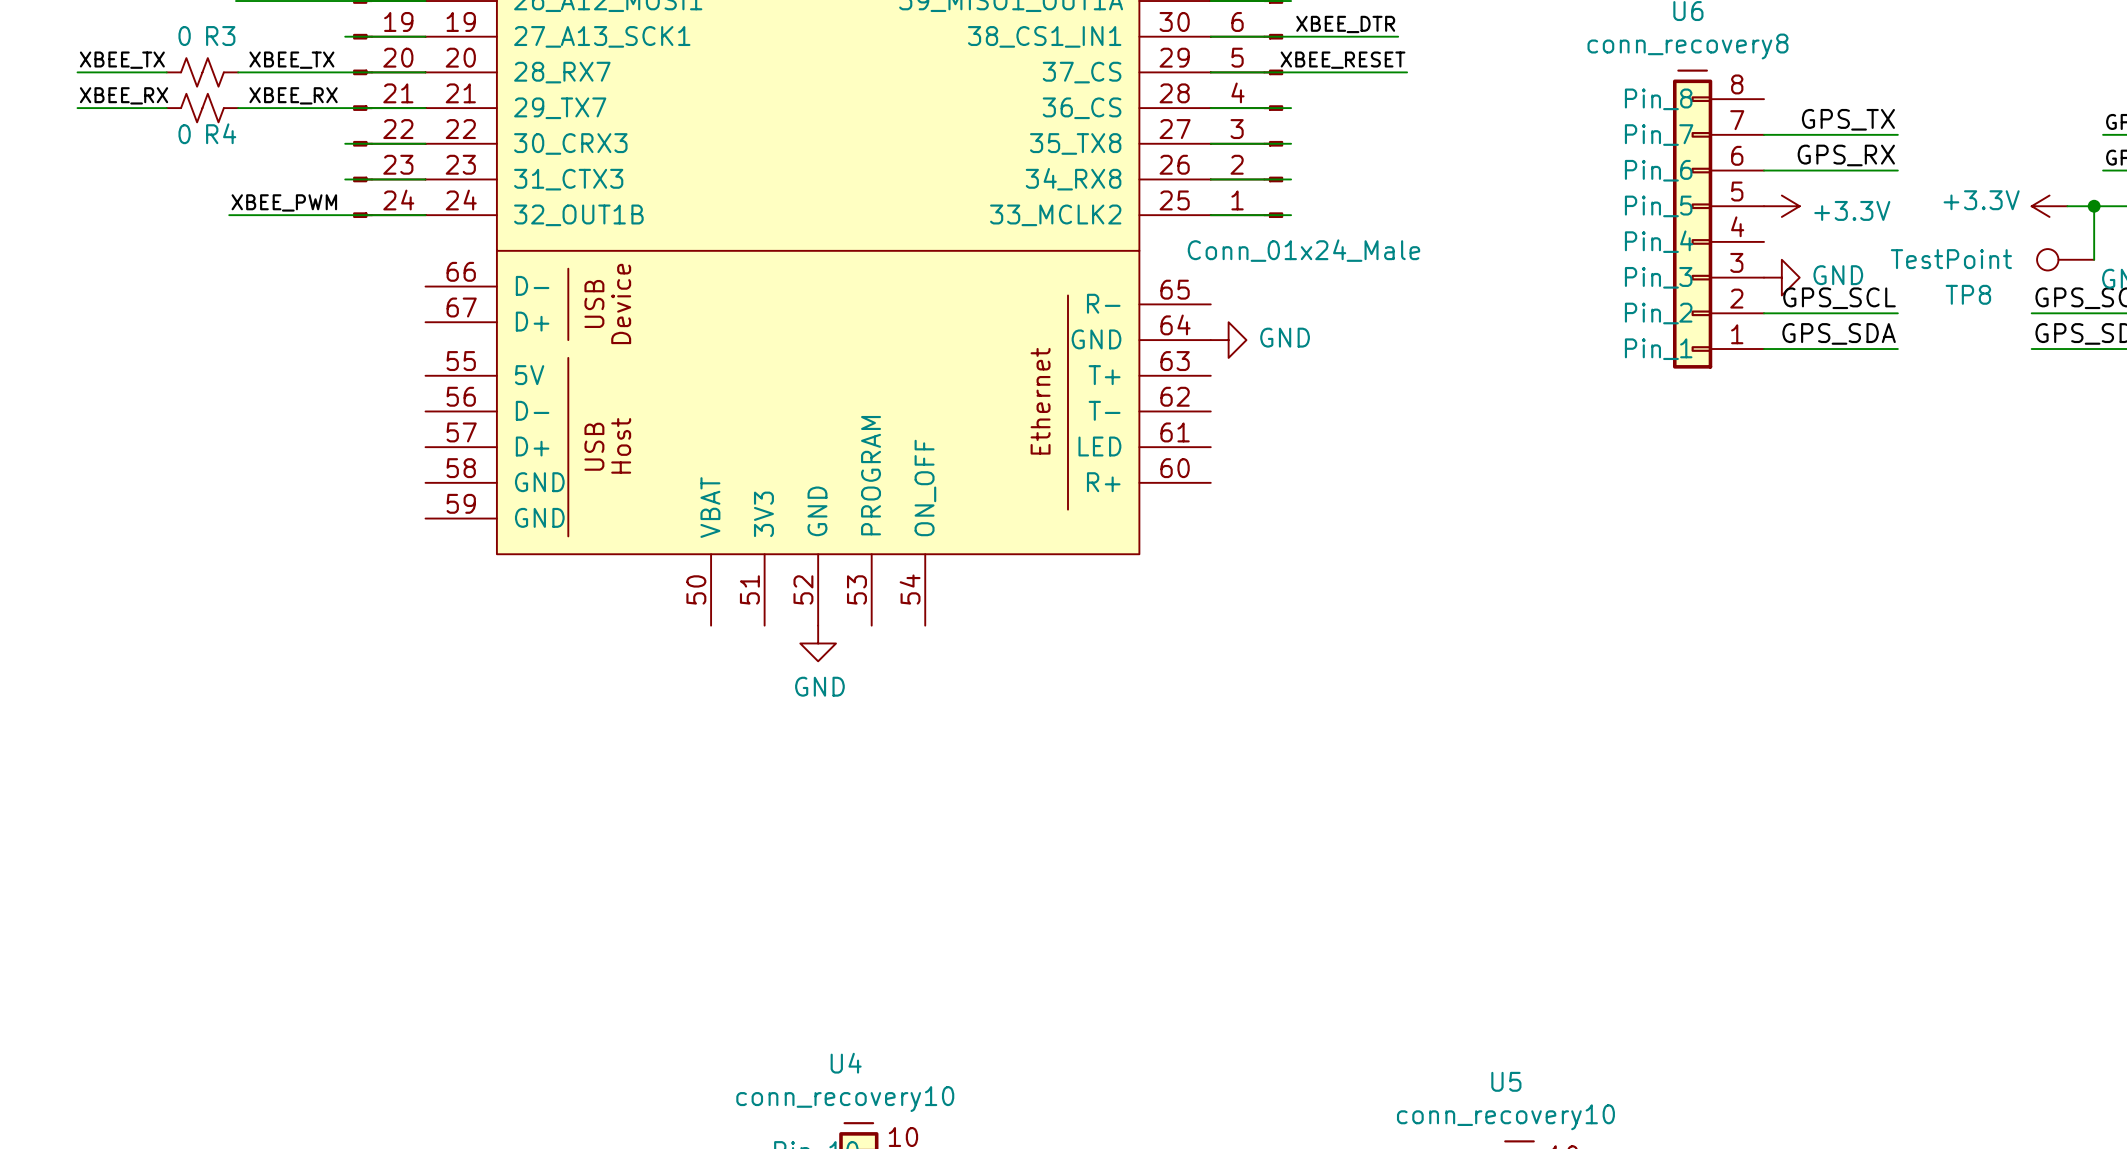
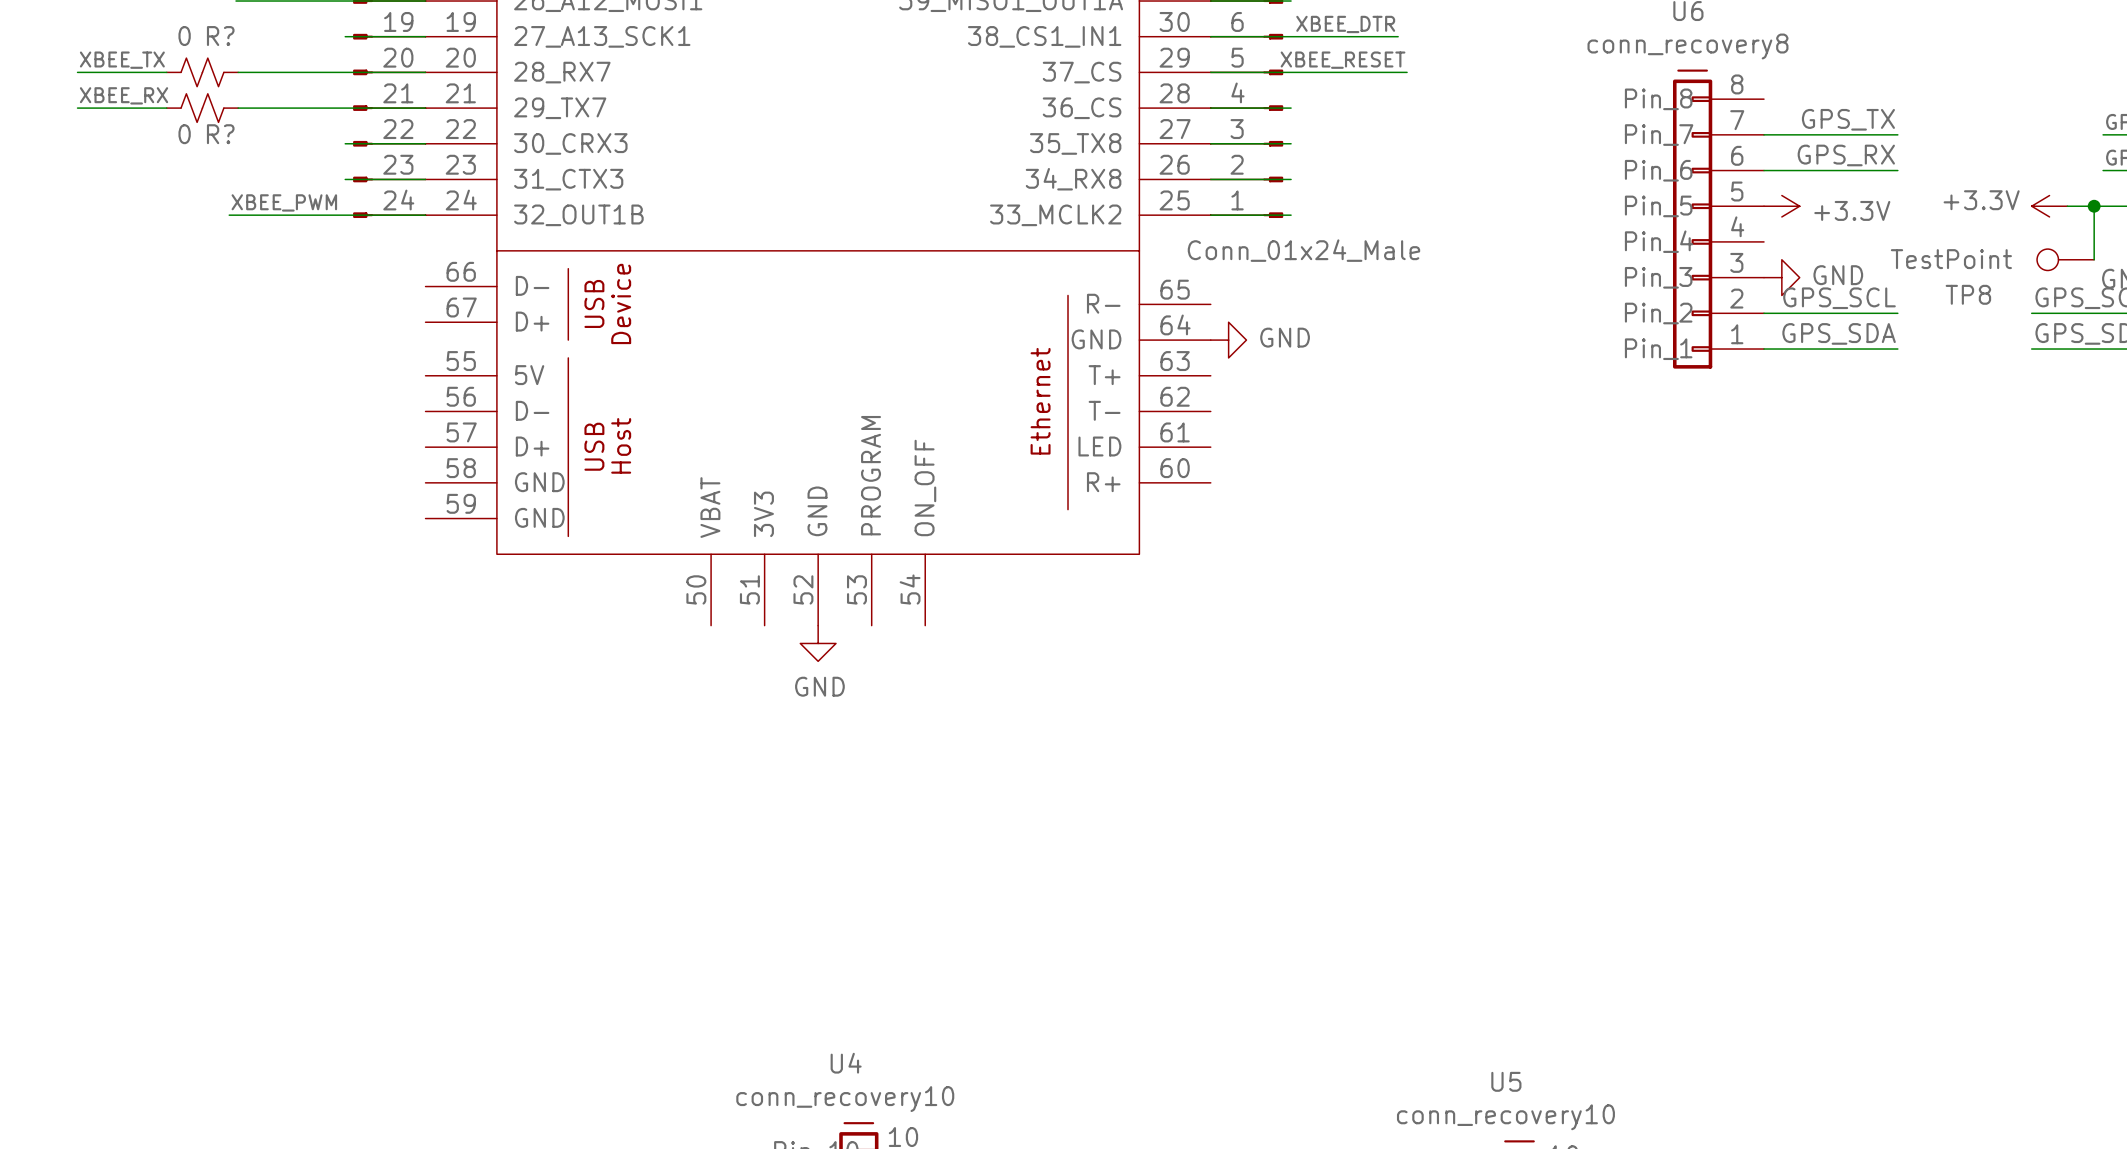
R3 name: R3 (220, 36) -> R? (220, 36)
label: XBEE_TX (291, 60) -> none
label: XBEE_RX (293, 95) -> none
R4 name: R4 (221, 133) -> R? (220, 134)

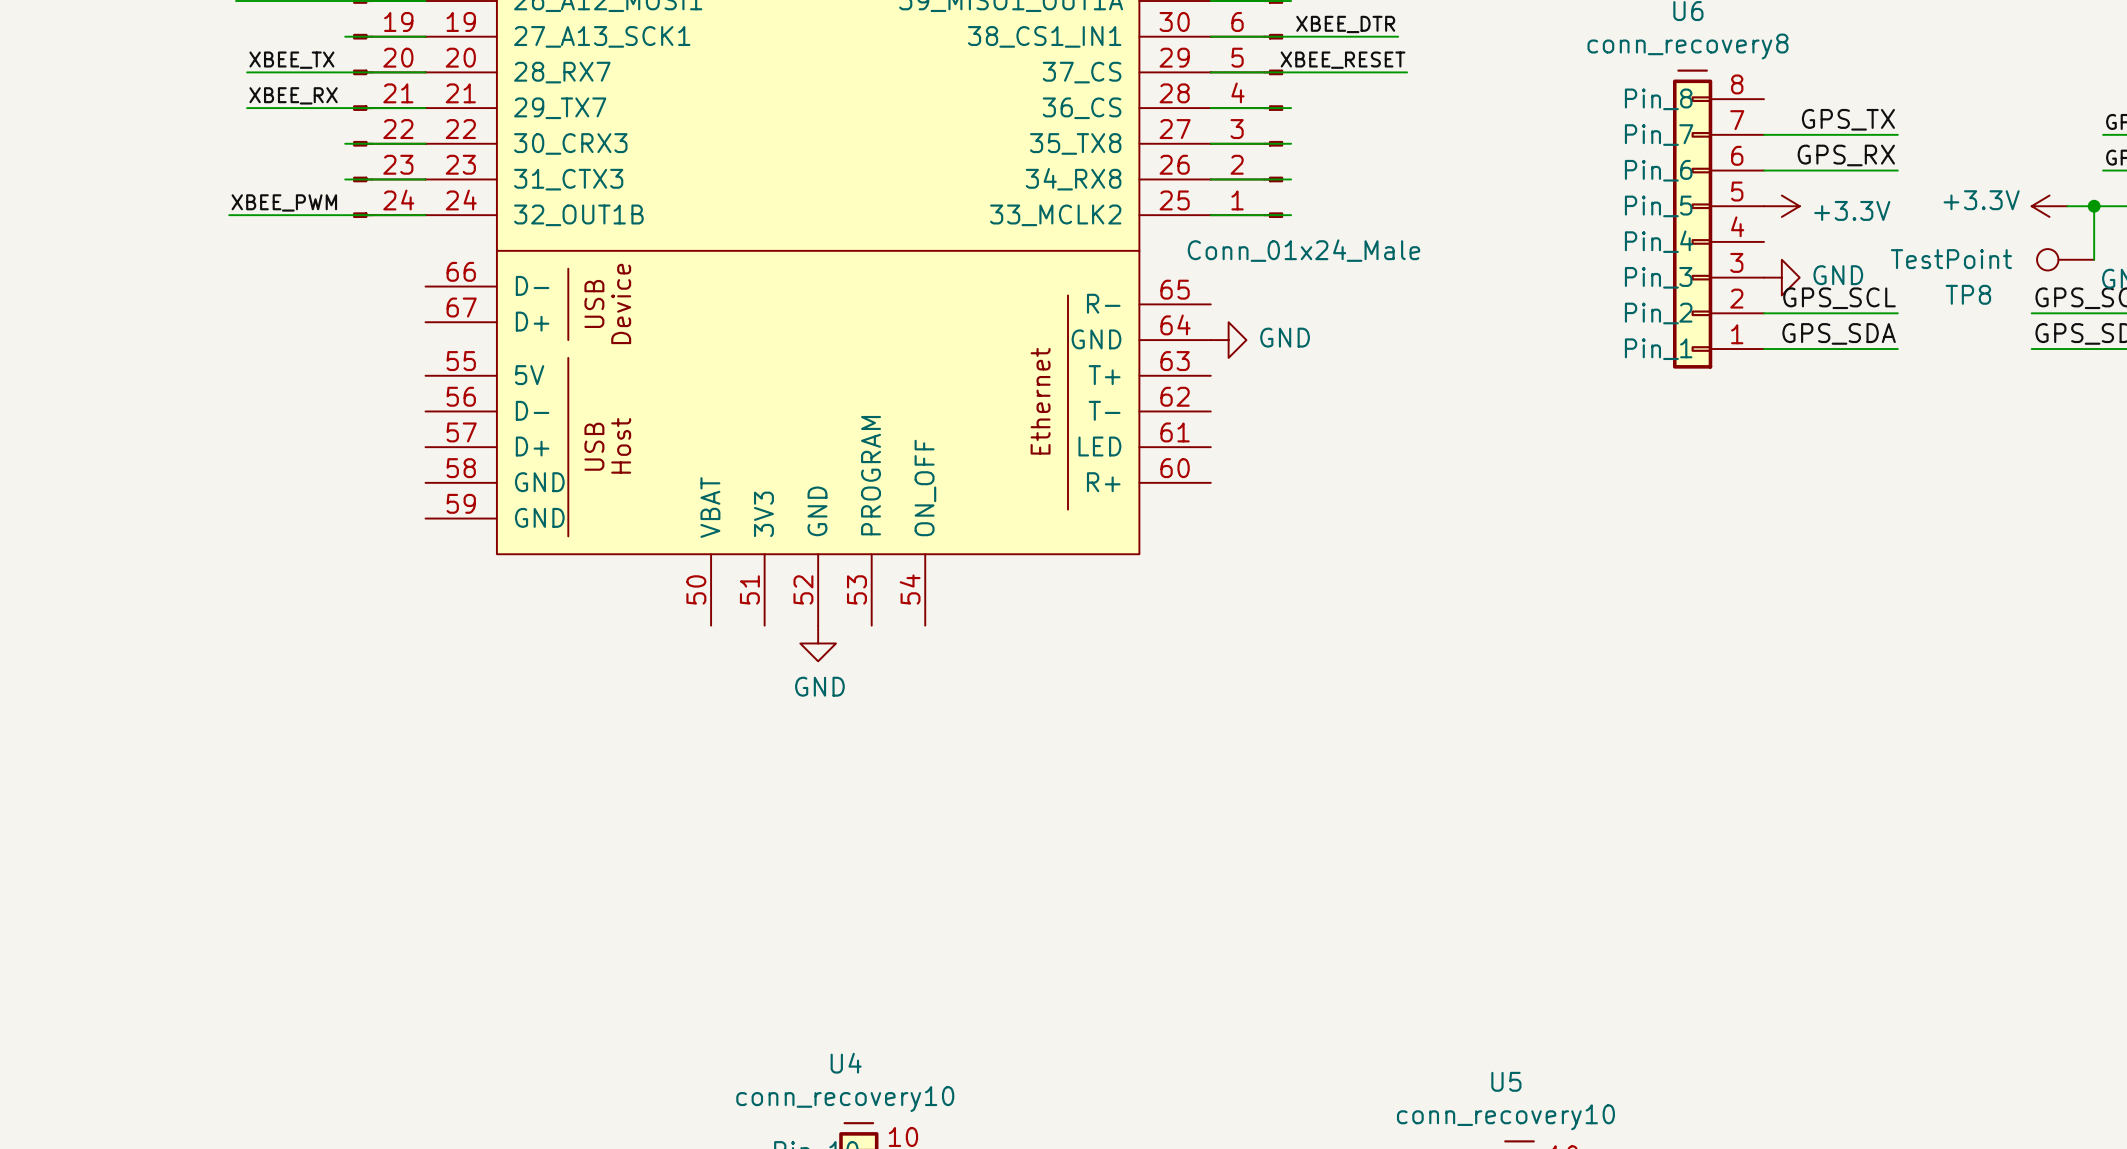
label position: XBEE_TX (122, 60) -> XBEE_TX (291, 60)
wire: (77, 72) (166, 72) -> none
R?: 0 (202, 72) -> none
wire: (238, 72) (247, 72) -> none
label position: XBEE_RX (124, 95) -> XBEE_RX (293, 95)
wire: (77, 108) (166, 108) -> none
R?: 0 (202, 108) -> none
wire: (238, 108) (247, 108) -> none

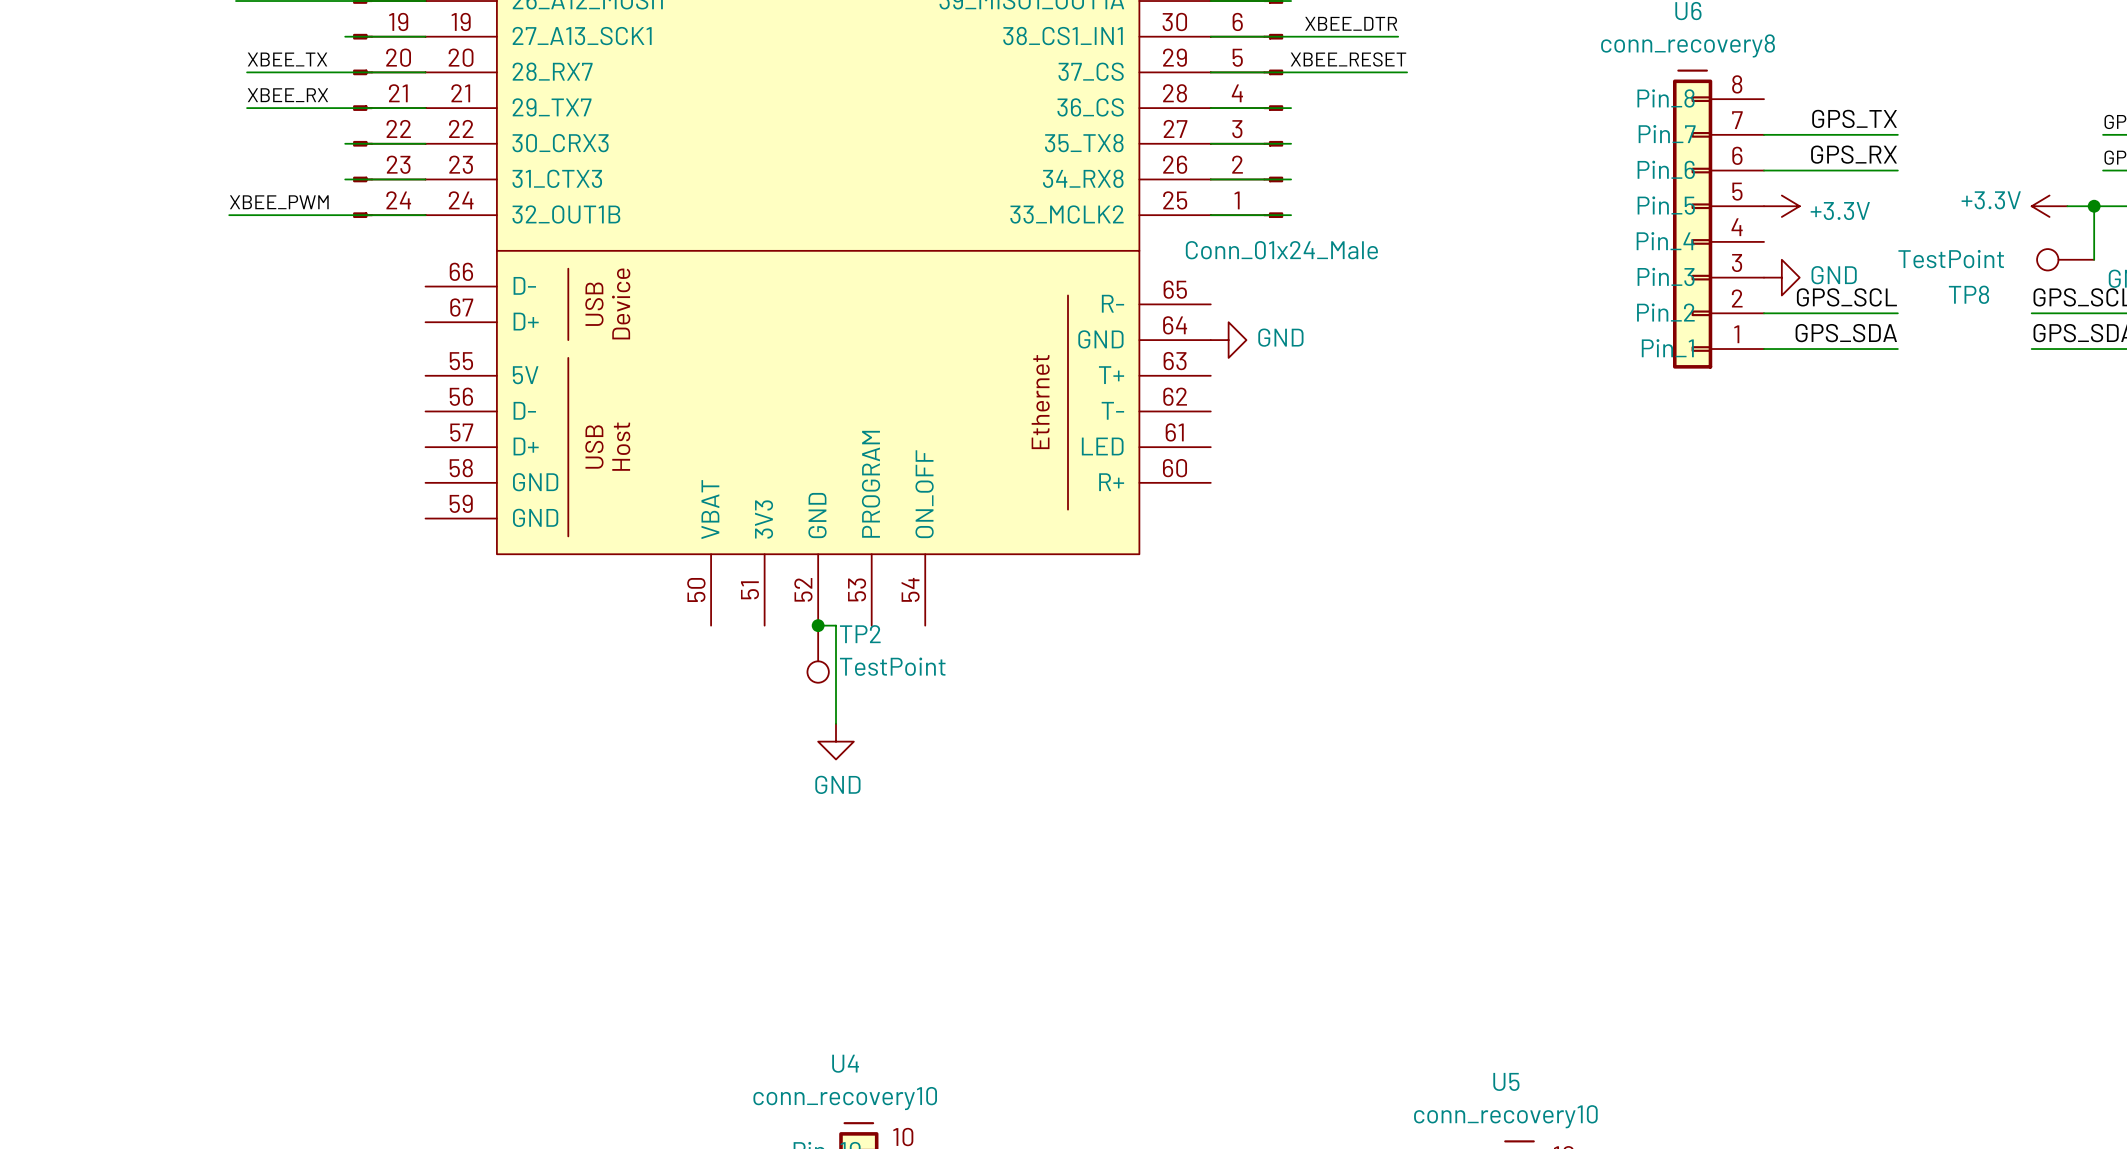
wire: none -> (818, 625) (836, 625) (836, 723)
junction: none -> (818, 625)
power symbol position: GND (818, 643) -> GND (836, 741)
TP2: none -> TestPoint (818, 654)

